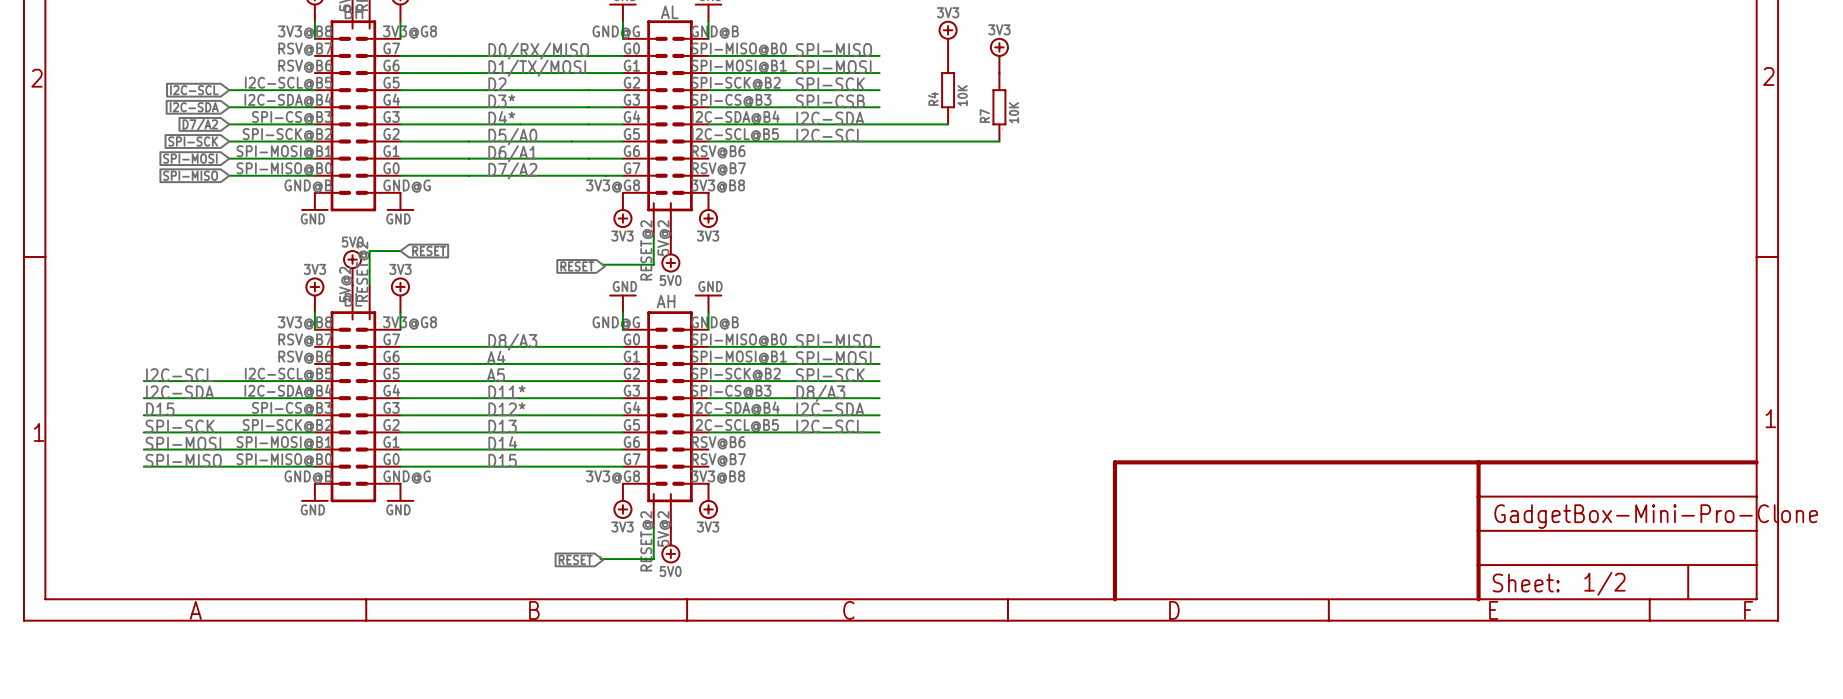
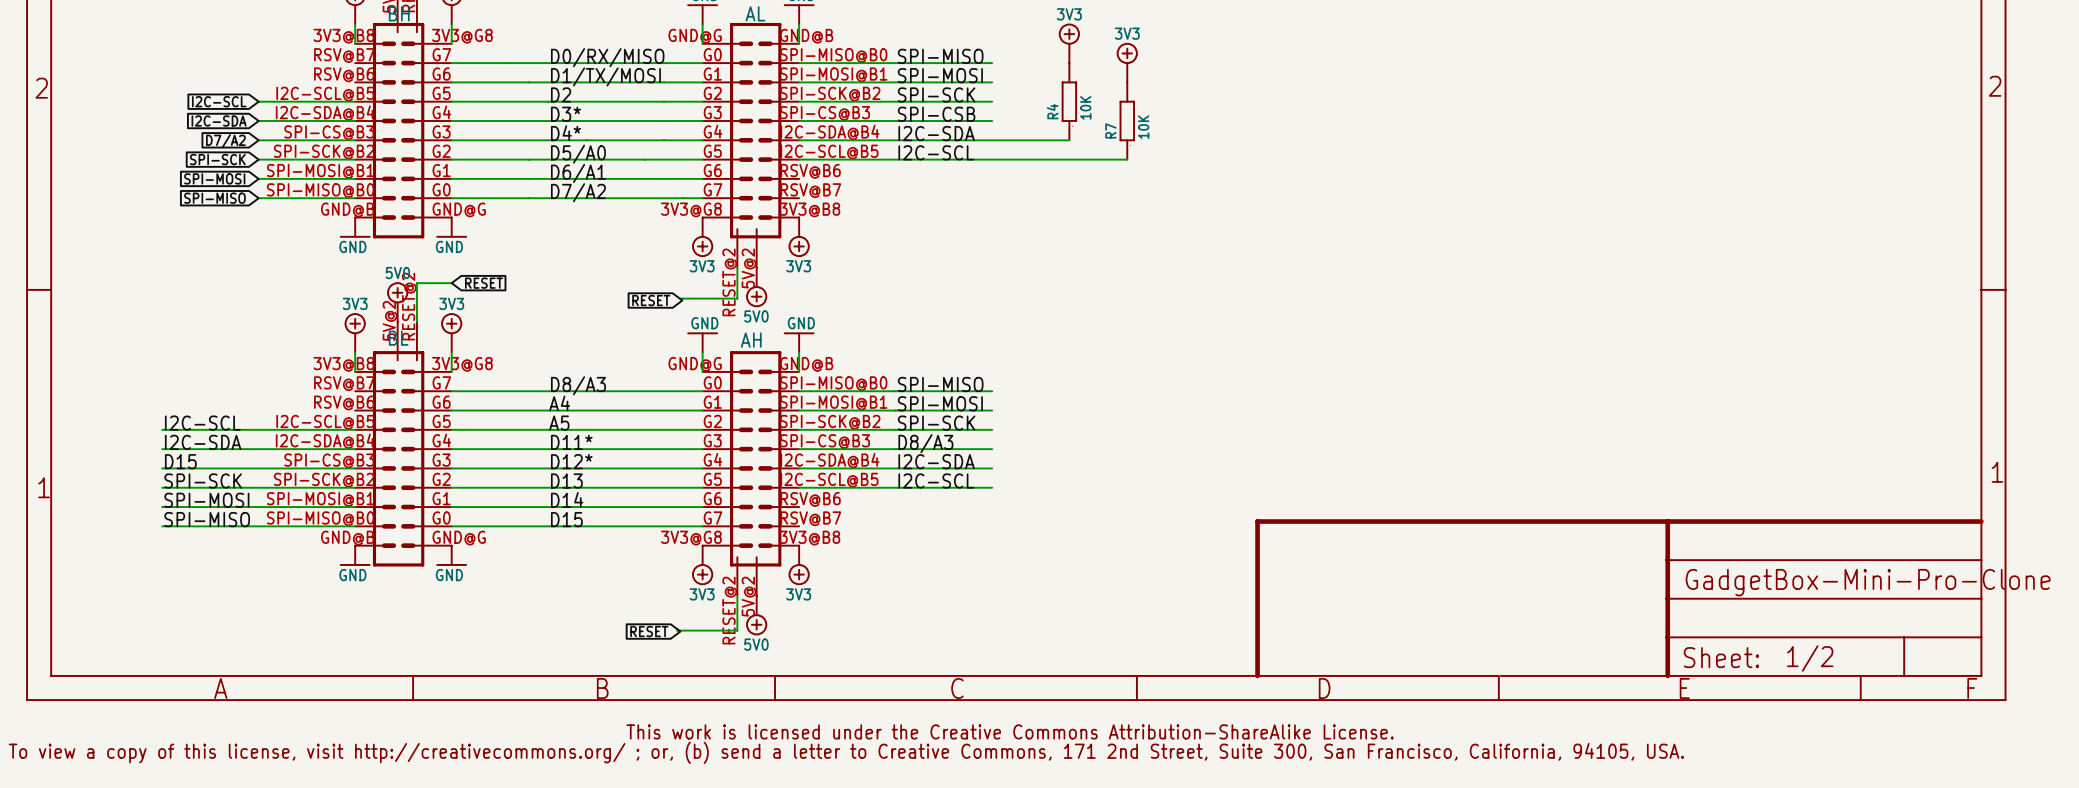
text: none -> This work is licensed under the Creative Commons Attribution-ShareAlike License. (1010, 731)
text: none -> To view a copy of this license, visit http://creativecommons.org/ ; or, (b) send a letter to Creative Commons, 171 2nd Street, Suite 300, San Francisco, California, 94105, USA. (846, 752)

